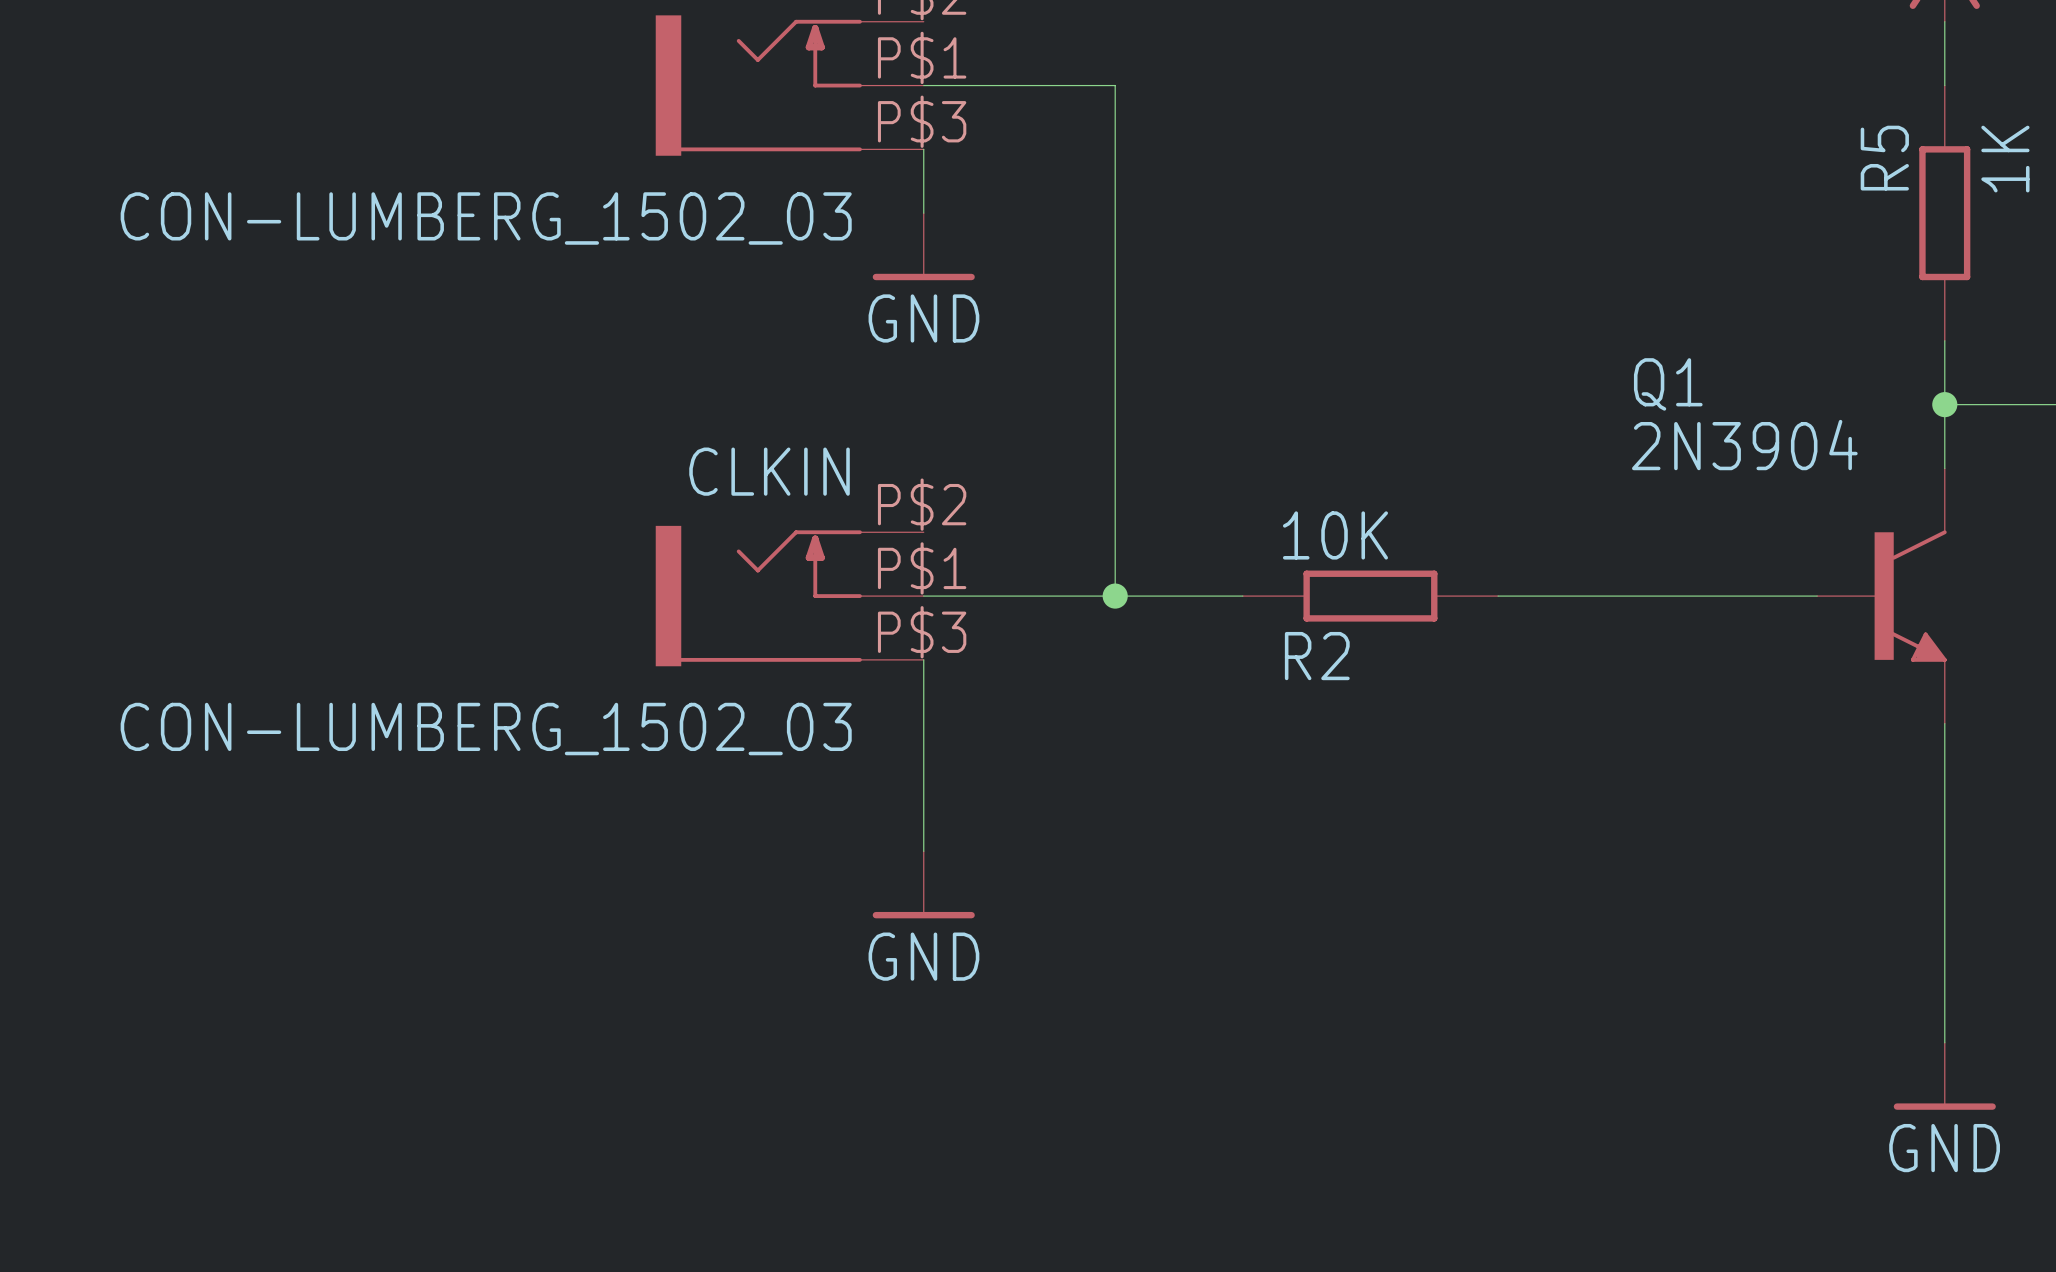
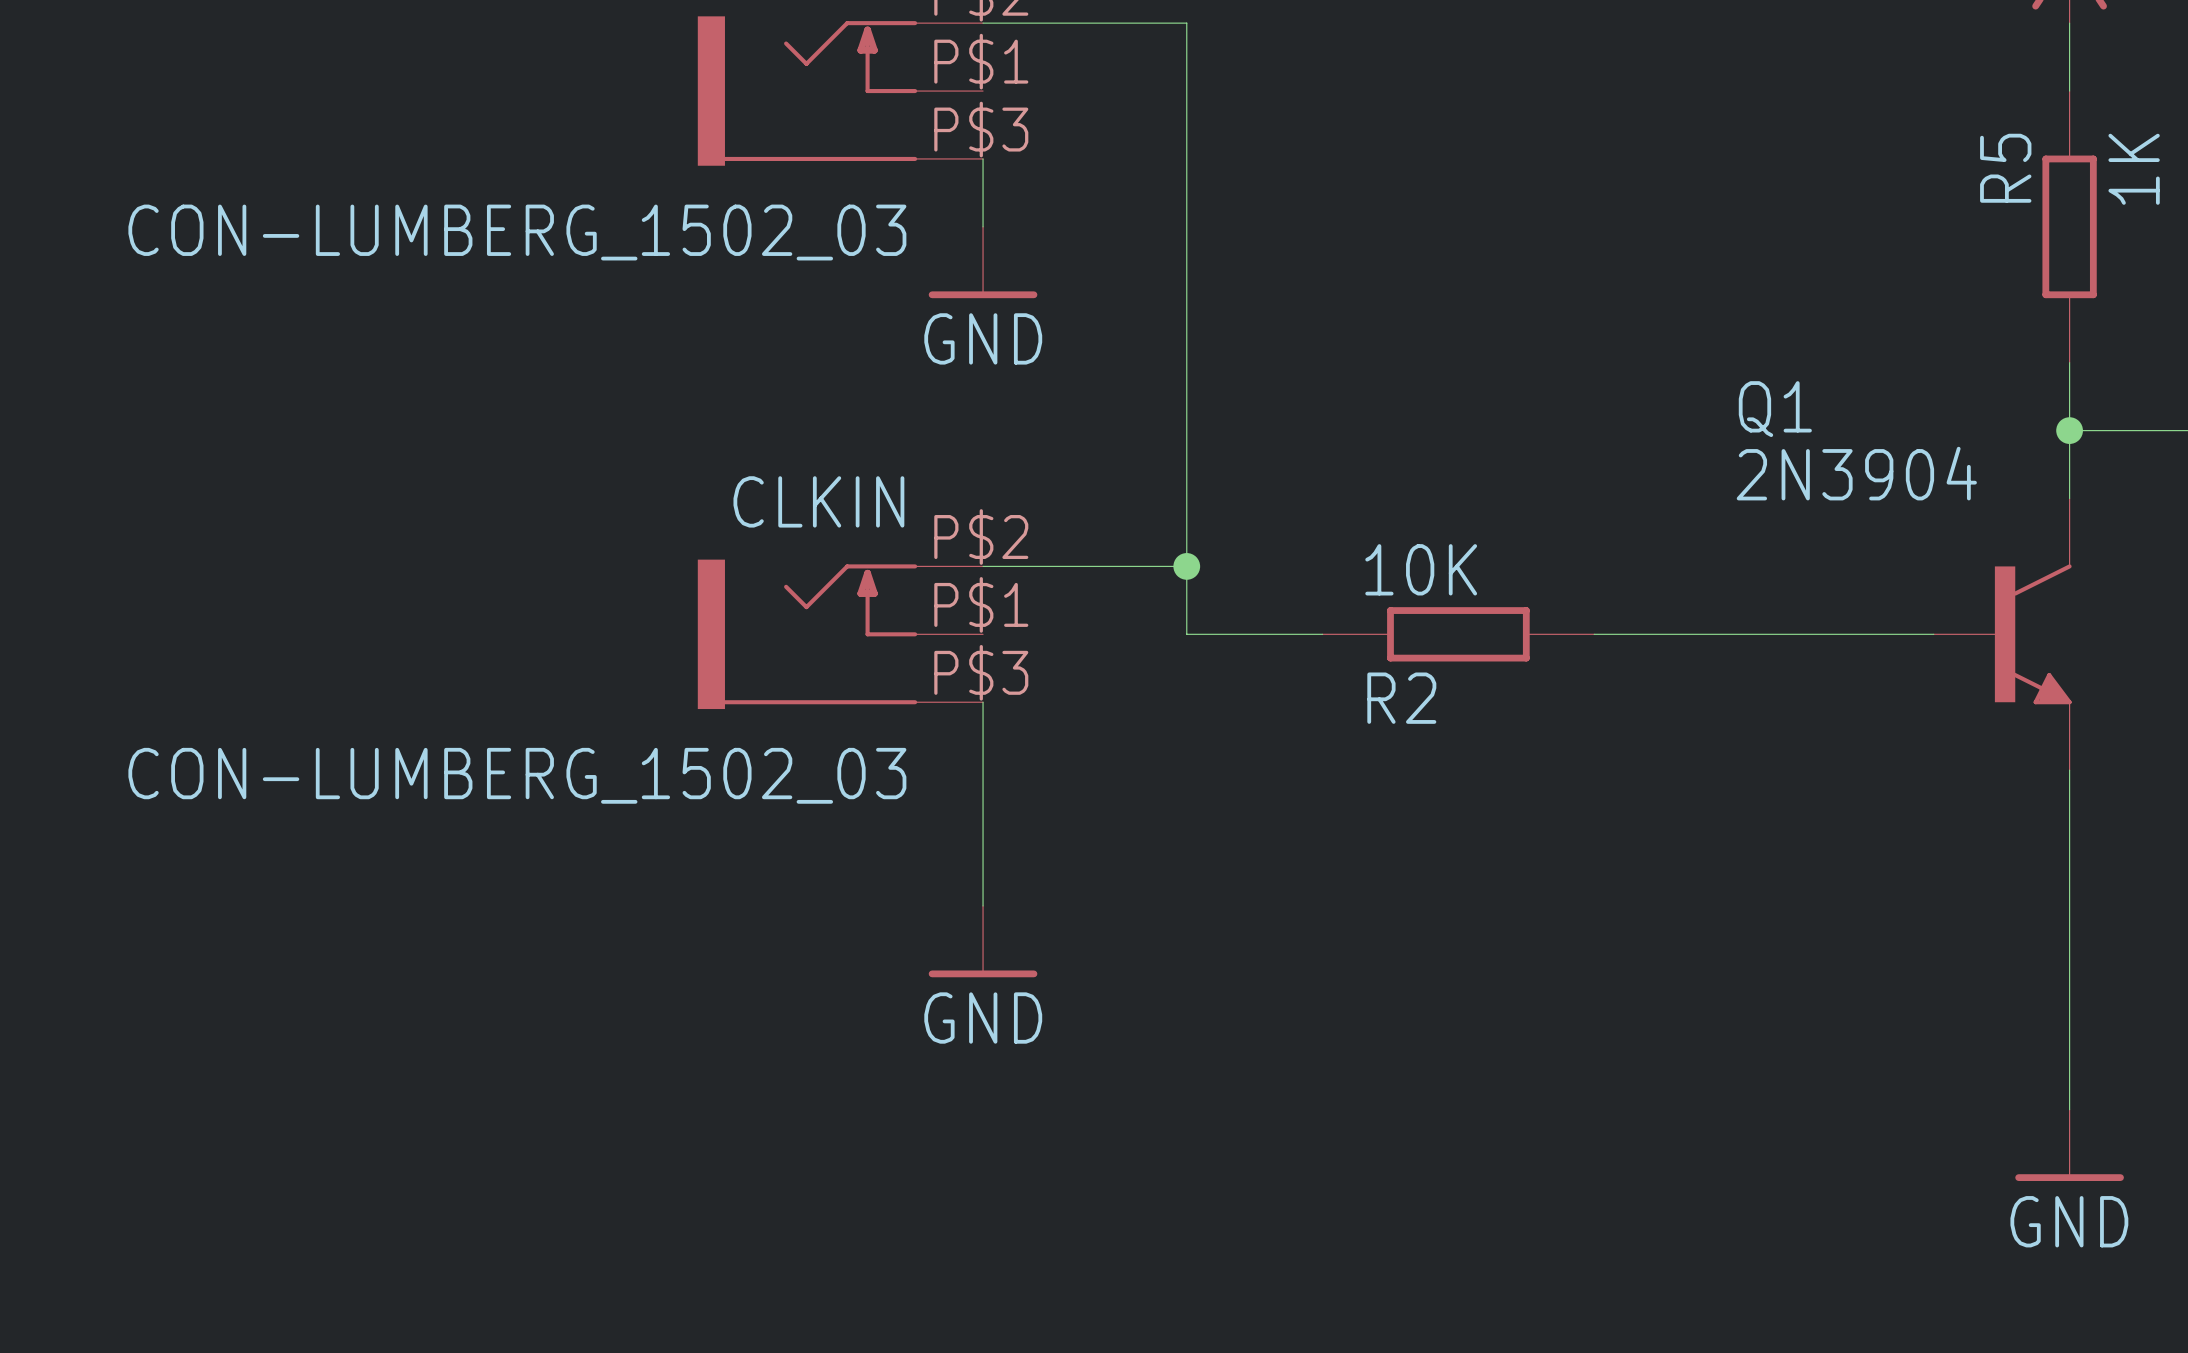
wire: (923, 85) (1115, 85) -> (983, 23) (1186, 23) (1186, 91)
wire: (923, 596) (1115, 596) -> (983, 566) (1186, 566)
junction position: (1115, 596) -> (1186, 566)

